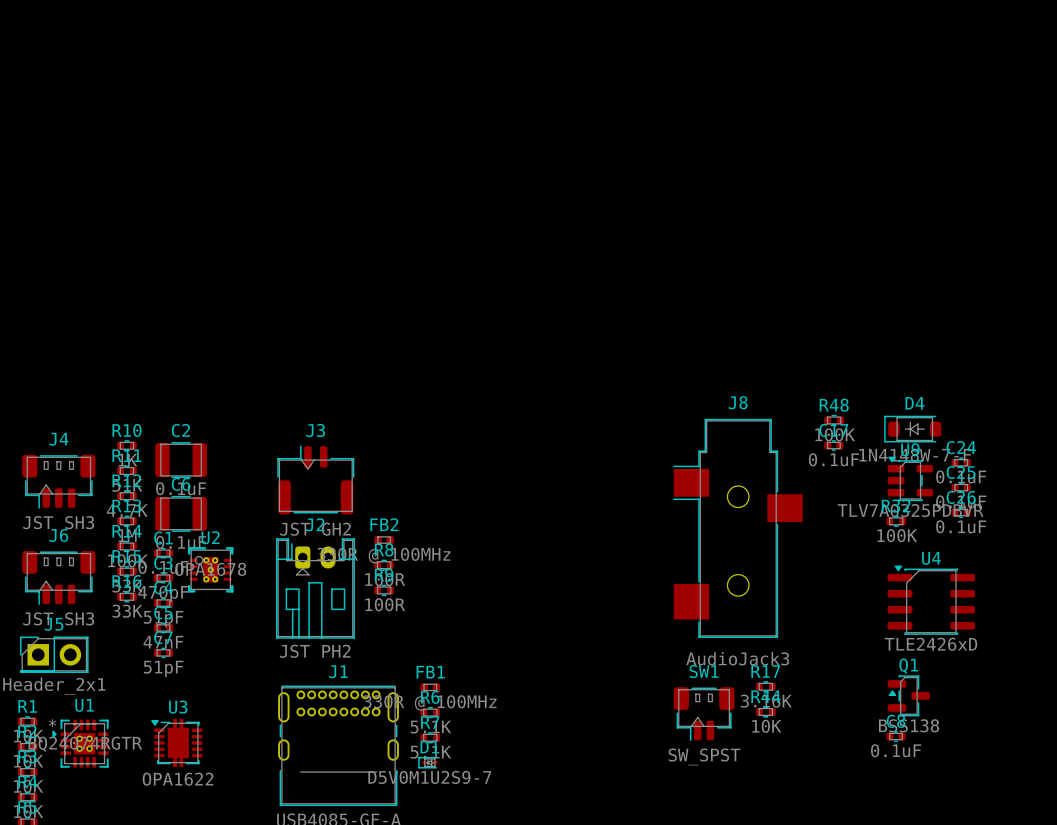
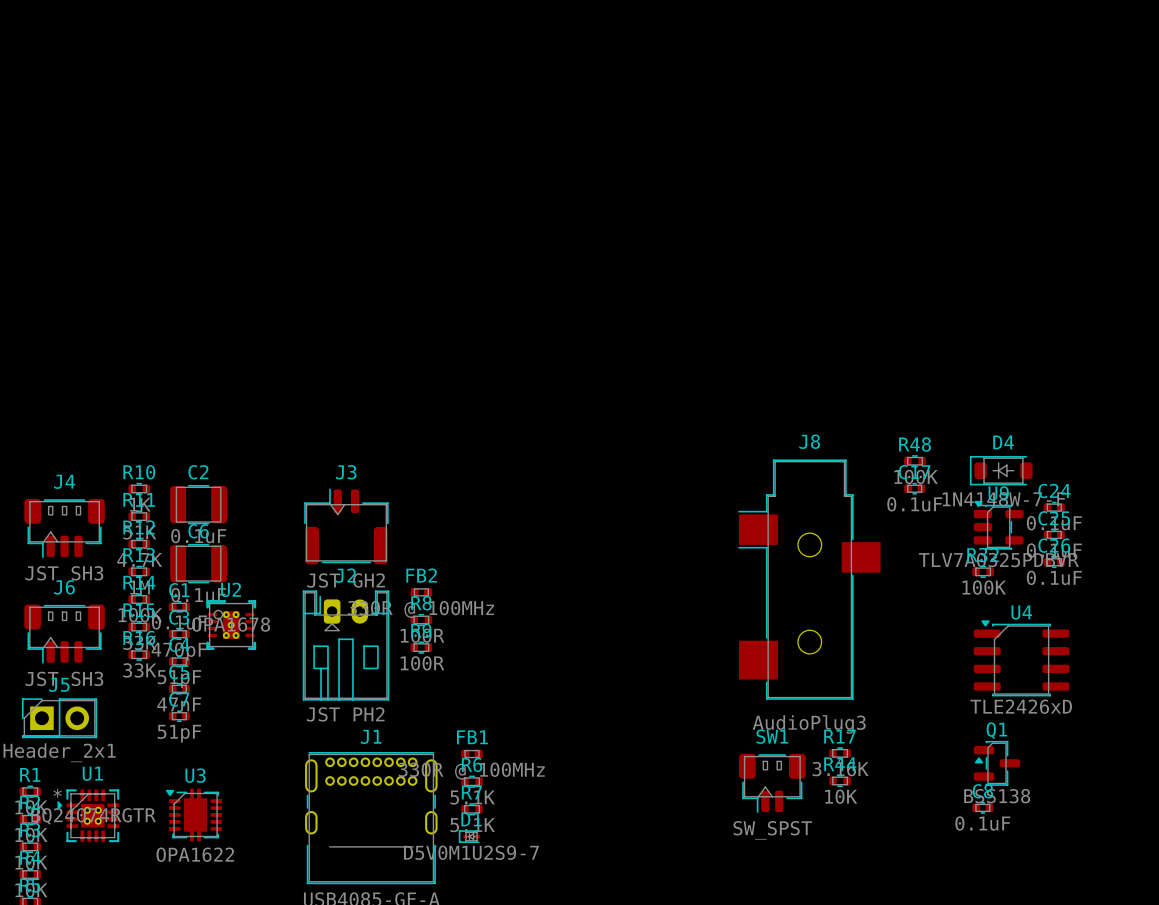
J8 value: AudioJack3 (737, 658) -> AudioPlug3 (809, 724)

